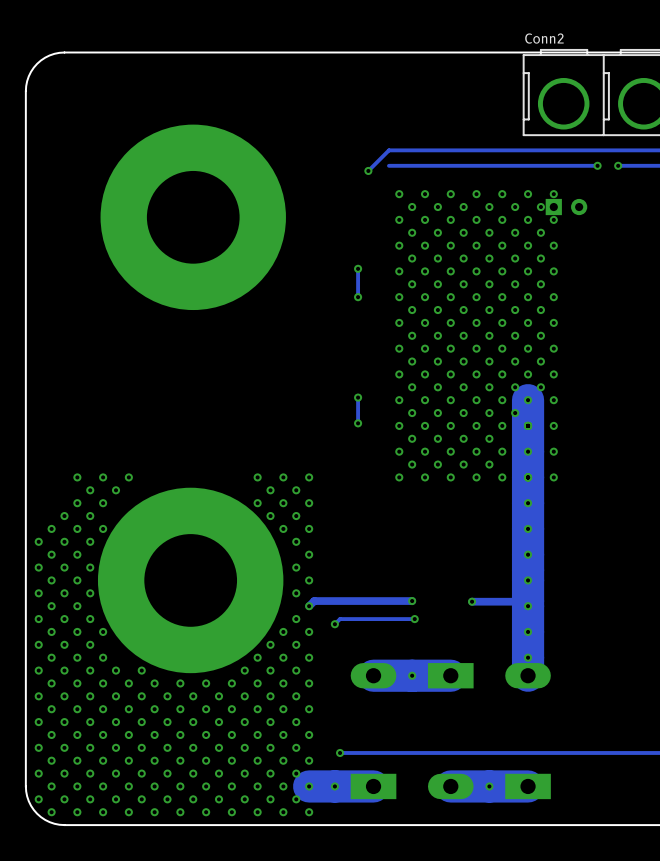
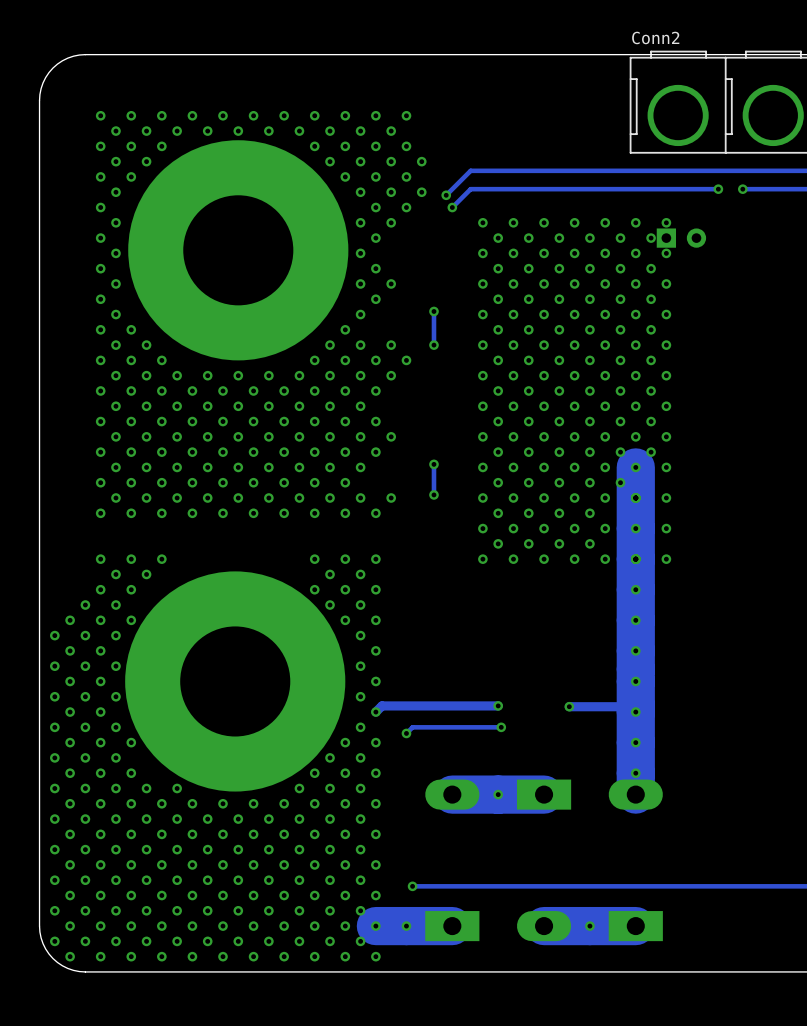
via: none -> (100, 115)
via: none -> (131, 115)
via: none -> (161, 115)
via: none -> (192, 115)
via: none -> (223, 115)
via: none -> (253, 115)
via: none -> (284, 115)
via: none -> (314, 115)
via: none -> (345, 115)
via: none -> (375, 115)
via: none -> (406, 115)
via: none -> (115, 131)
via: none -> (146, 131)
via: none -> (177, 131)
via: none -> (207, 131)
via: none -> (238, 131)
via: none -> (268, 131)
via: none -> (299, 131)
via: none -> (330, 131)
via: none -> (360, 131)
via: none -> (391, 131)
via: none -> (100, 146)
via: none -> (131, 146)
via: none -> (161, 146)
via: none -> (314, 146)
via: none -> (345, 146)
via: none -> (375, 146)
via: none -> (406, 146)
via: none -> (115, 161)
via: none -> (146, 161)
via: none -> (330, 161)
via: none -> (360, 161)
via: none -> (391, 161)
via: none -> (421, 161)
via: none -> (100, 176)
via: none -> (131, 176)
via: none -> (345, 176)
via: none -> (375, 176)
via: none -> (406, 176)
track: none -> (470, 189) (452, 207)
via: none -> (115, 192)
via: none -> (360, 192)
via: none -> (391, 192)
via: none -> (421, 192)
via: none -> (100, 207)
via: none -> (375, 207)
via: none -> (406, 207)
via: none -> (452, 207)
via: none -> (115, 222)
via: none -> (360, 222)
via: none -> (391, 222)
via: none -> (100, 238)
via: none -> (375, 238)
via: none -> (115, 253)
via: none -> (360, 253)
via: none -> (100, 268)
via: none -> (375, 268)
via: none -> (115, 283)
via: none -> (360, 283)
via: none -> (391, 283)
via: none -> (100, 299)
via: none -> (375, 299)
via: none -> (115, 314)
via: none -> (360, 314)
via: none -> (100, 329)
via: none -> (131, 329)
via: none -> (345, 329)
via: none -> (115, 345)
via: none -> (146, 345)
via: none -> (330, 345)
via: none -> (360, 345)
via: none -> (391, 345)
via: none -> (100, 360)
via: none -> (131, 360)
via: none -> (161, 360)
via: none -> (314, 360)
via: none -> (345, 360)
via: none -> (375, 360)
via: none -> (406, 360)
via: none -> (115, 375)
via: none -> (146, 375)
via: none -> (177, 375)
via: none -> (207, 375)
via: none -> (238, 375)
via: none -> (268, 375)
via: none -> (299, 375)
via: none -> (330, 375)
via: none -> (360, 375)
via: none -> (391, 375)
via: none -> (100, 390)
via: none -> (131, 390)
via: none -> (161, 390)
via: none -> (192, 390)
via: none -> (223, 390)
via: none -> (253, 390)
via: none -> (284, 390)
via: none -> (314, 390)
via: none -> (345, 390)
via: none -> (375, 390)
via: none -> (115, 406)
via: none -> (146, 406)
via: none -> (177, 406)
via: none -> (207, 406)
via: none -> (238, 406)
via: none -> (268, 406)
via: none -> (299, 406)
via: none -> (330, 406)
via: none -> (360, 406)
via: none -> (100, 421)
via: none -> (131, 421)
via: none -> (161, 421)
via: none -> (192, 421)
via: none -> (223, 421)
via: none -> (253, 421)
via: none -> (284, 421)
via: none -> (314, 421)
via: none -> (345, 421)
via: none -> (375, 421)
via: none -> (115, 436)
via: none -> (146, 436)
via: none -> (177, 436)
via: none -> (207, 436)
via: none -> (238, 436)
via: none -> (268, 436)
via: none -> (299, 436)
via: none -> (330, 436)
via: none -> (360, 436)
via: none -> (391, 436)
via: none -> (100, 452)
via: none -> (131, 452)
via: none -> (161, 452)
via: none -> (192, 452)
via: none -> (223, 452)
via: none -> (253, 452)
via: none -> (284, 452)
via: none -> (314, 452)
via: none -> (345, 452)
via: none -> (375, 452)
via: none -> (115, 467)
via: none -> (146, 467)
via: none -> (177, 467)
via: none -> (207, 467)
via: none -> (238, 467)
via: none -> (268, 467)
via: none -> (299, 467)
via: none -> (330, 467)
via: none -> (360, 467)
via: none -> (100, 482)
via: none -> (131, 482)
via: none -> (161, 482)
via: none -> (192, 482)
via: none -> (223, 482)
via: none -> (253, 482)
via: none -> (284, 482)
via: none -> (314, 482)
via: none -> (345, 482)
via: none -> (115, 498)
via: none -> (146, 498)
via: none -> (177, 498)
via: none -> (207, 498)
via: none -> (238, 498)
via: none -> (268, 498)
via: none -> (299, 498)
via: none -> (330, 498)
via: none -> (360, 498)
via: none -> (391, 498)
via: none -> (100, 513)
via: none -> (131, 513)
via: none -> (161, 513)
via: none -> (192, 513)
via: none -> (223, 513)
via: none -> (253, 513)
via: none -> (284, 513)
via: none -> (314, 513)
via: none -> (345, 513)
via: none -> (375, 513)

